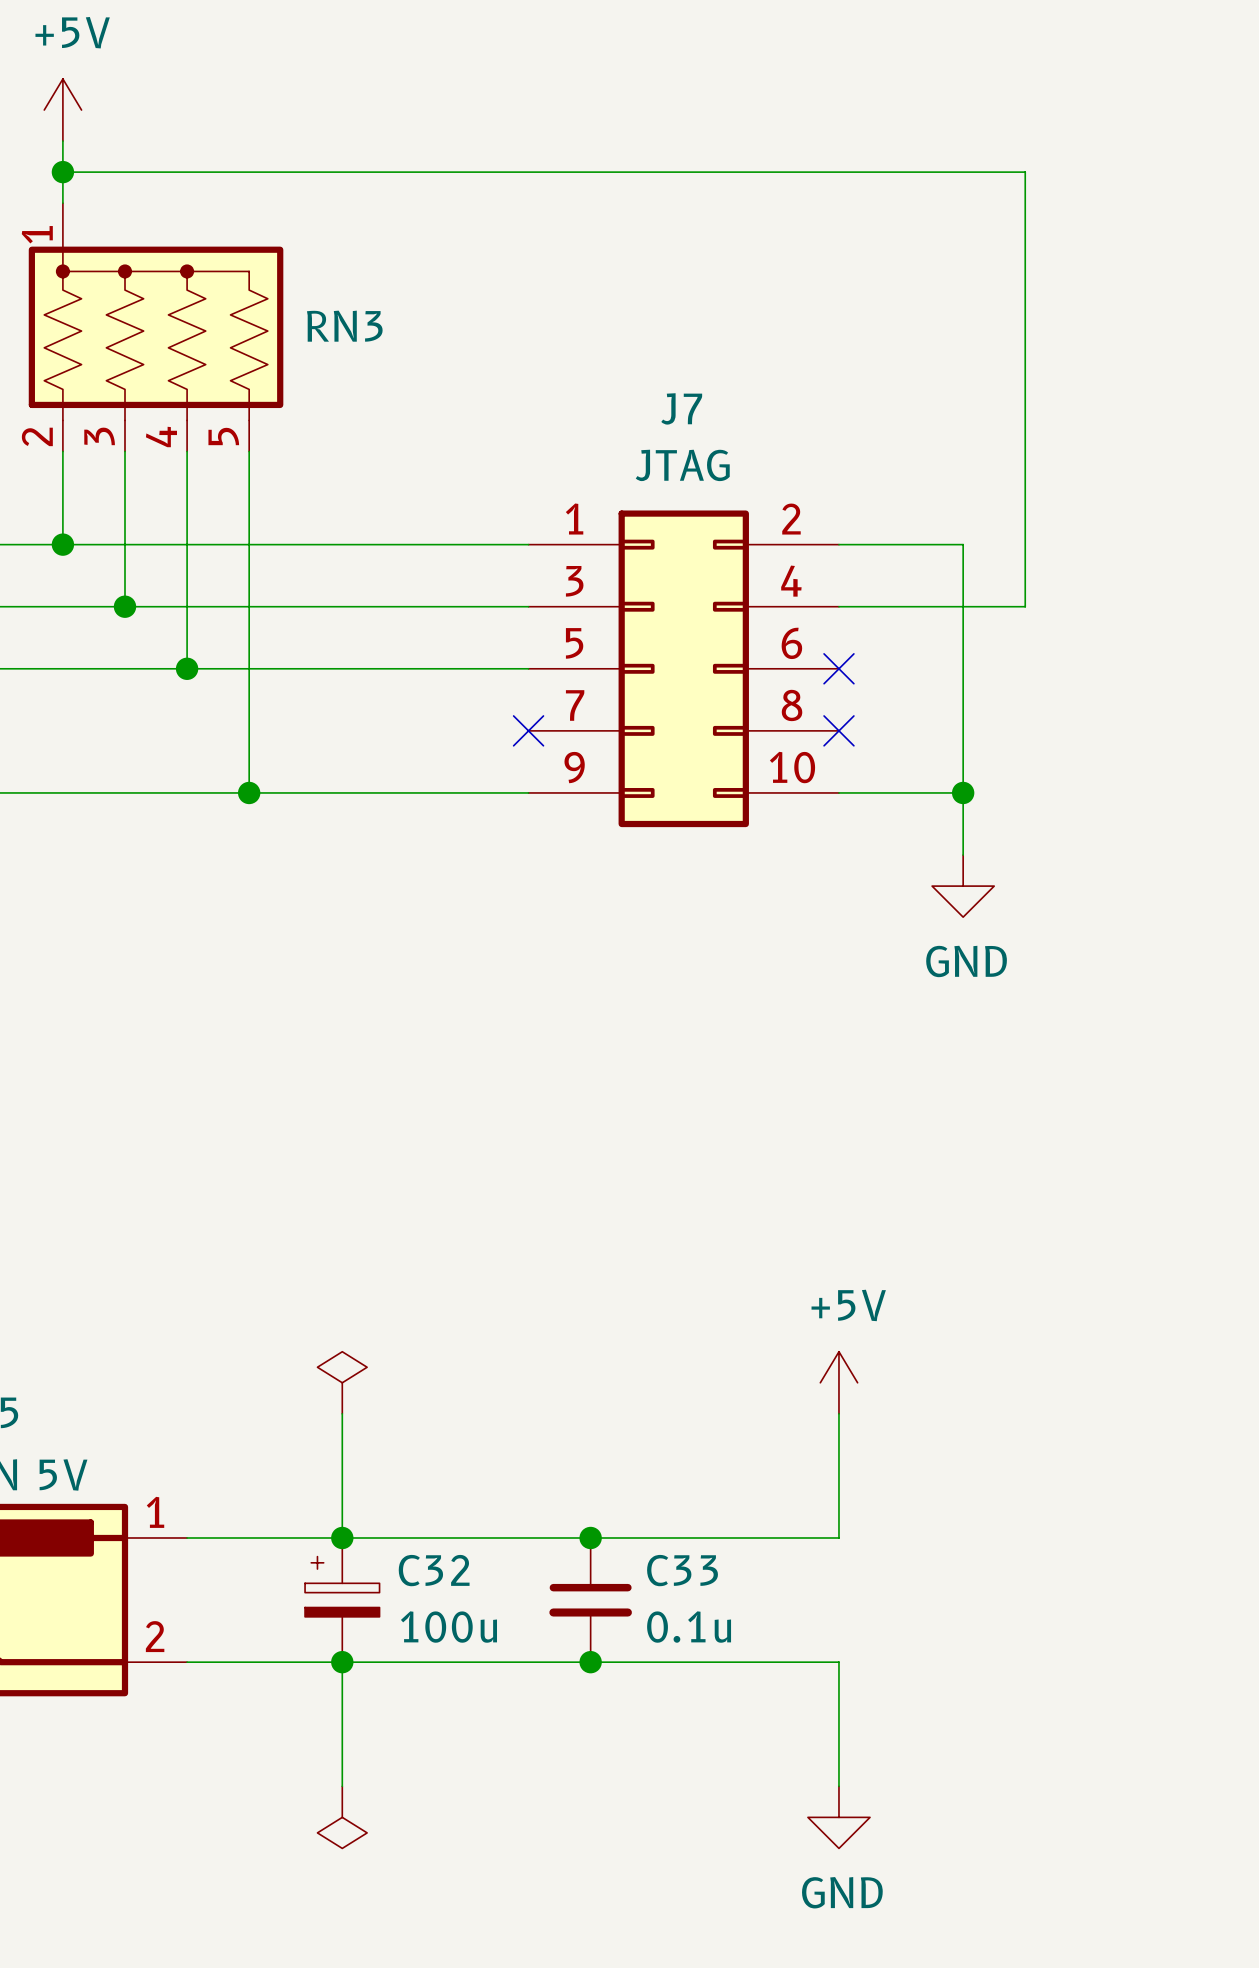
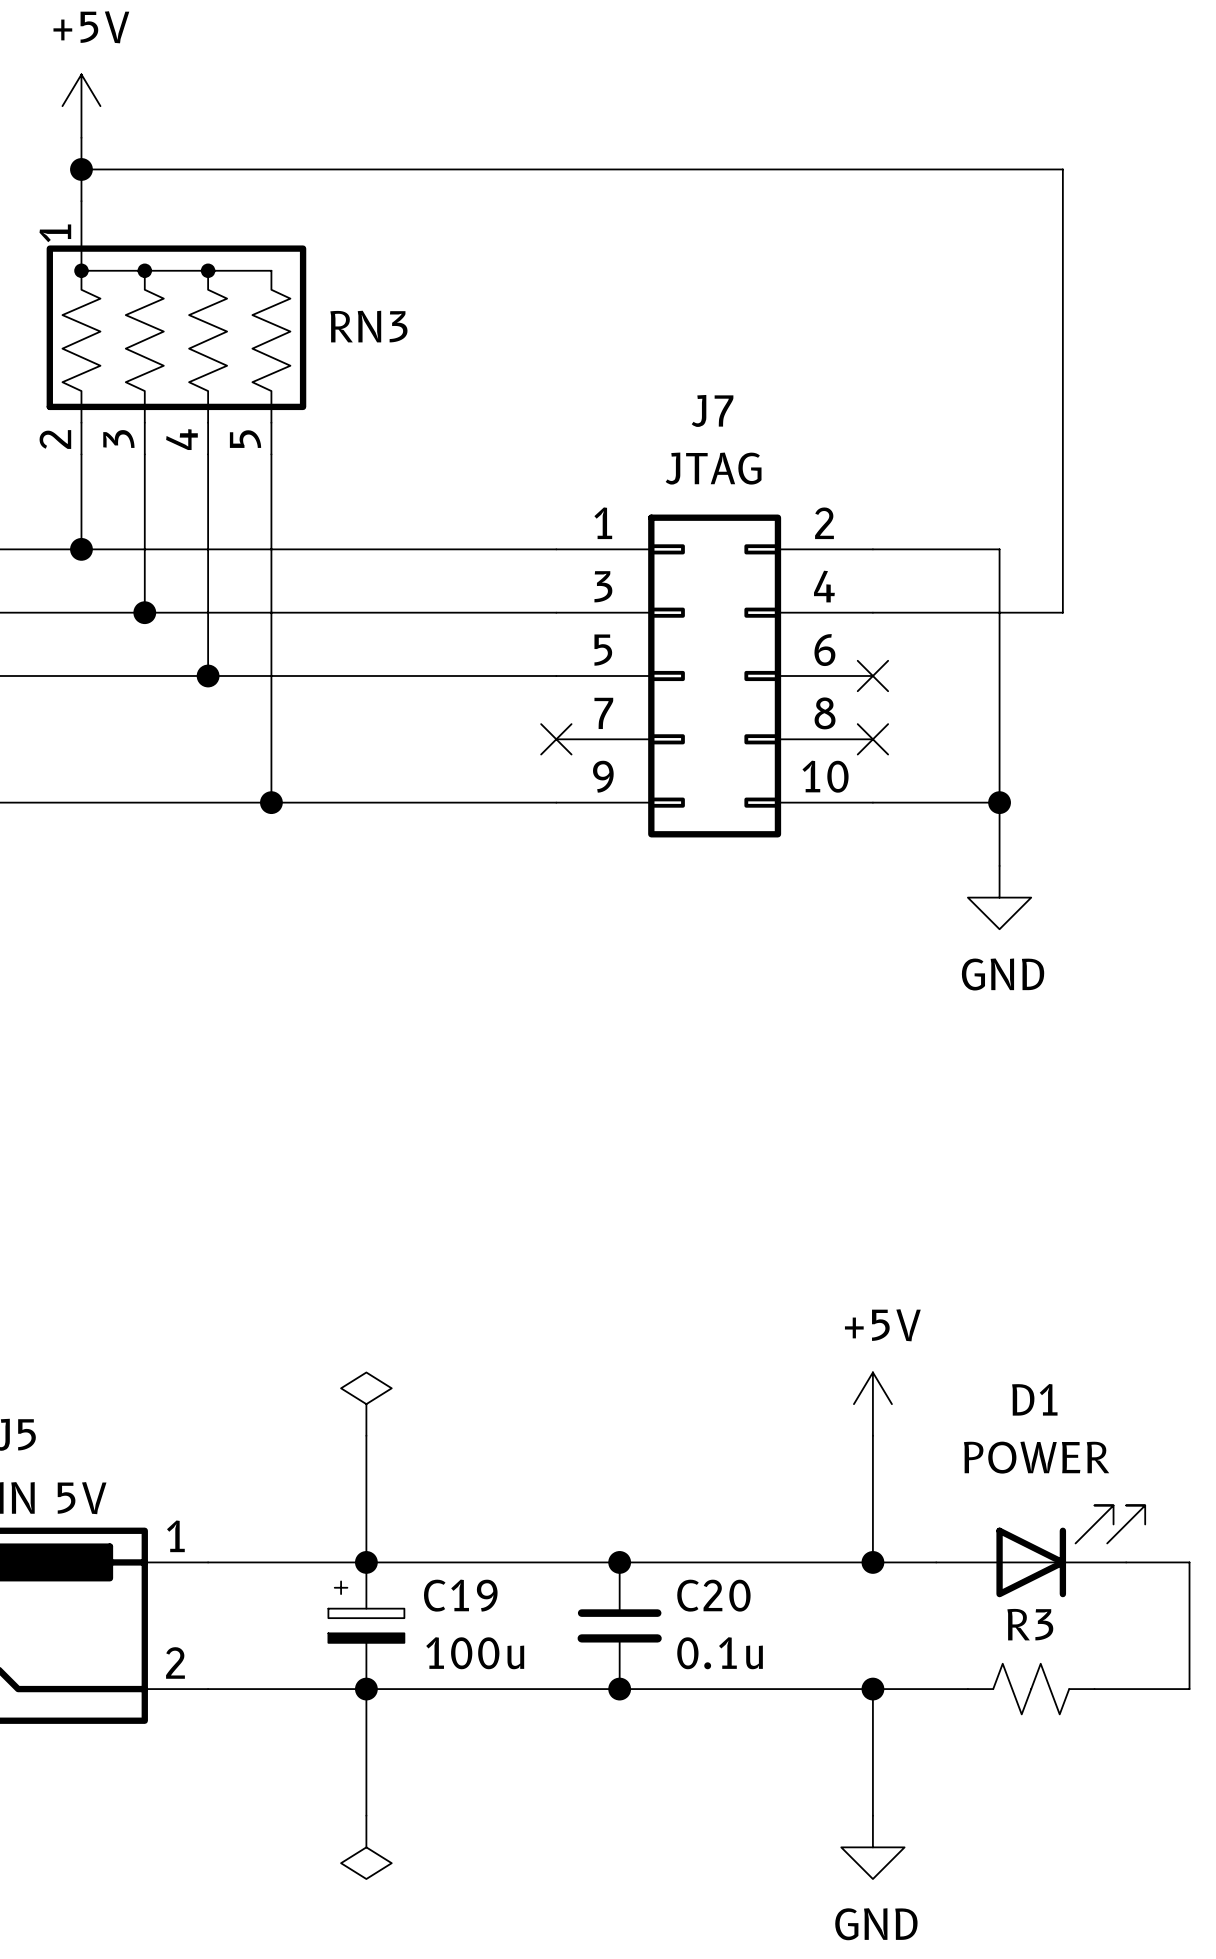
D1: none -> POWER (1040, 1551)
wire: none -> (872, 1562) (936, 1562)
junction: none -> (872, 1562)
wire: none -> (1126, 1562) (1189, 1562) (1189, 1689) (1094, 1689)
C32 name: C32 (434, 1570) -> C19 (460, 1595)
C33 name: C33 (682, 1570) -> C20 (713, 1595)
wire: none -> (872, 1689) (967, 1689)
junction: none -> (872, 1689)
R3: none -> (1031, 1689)

